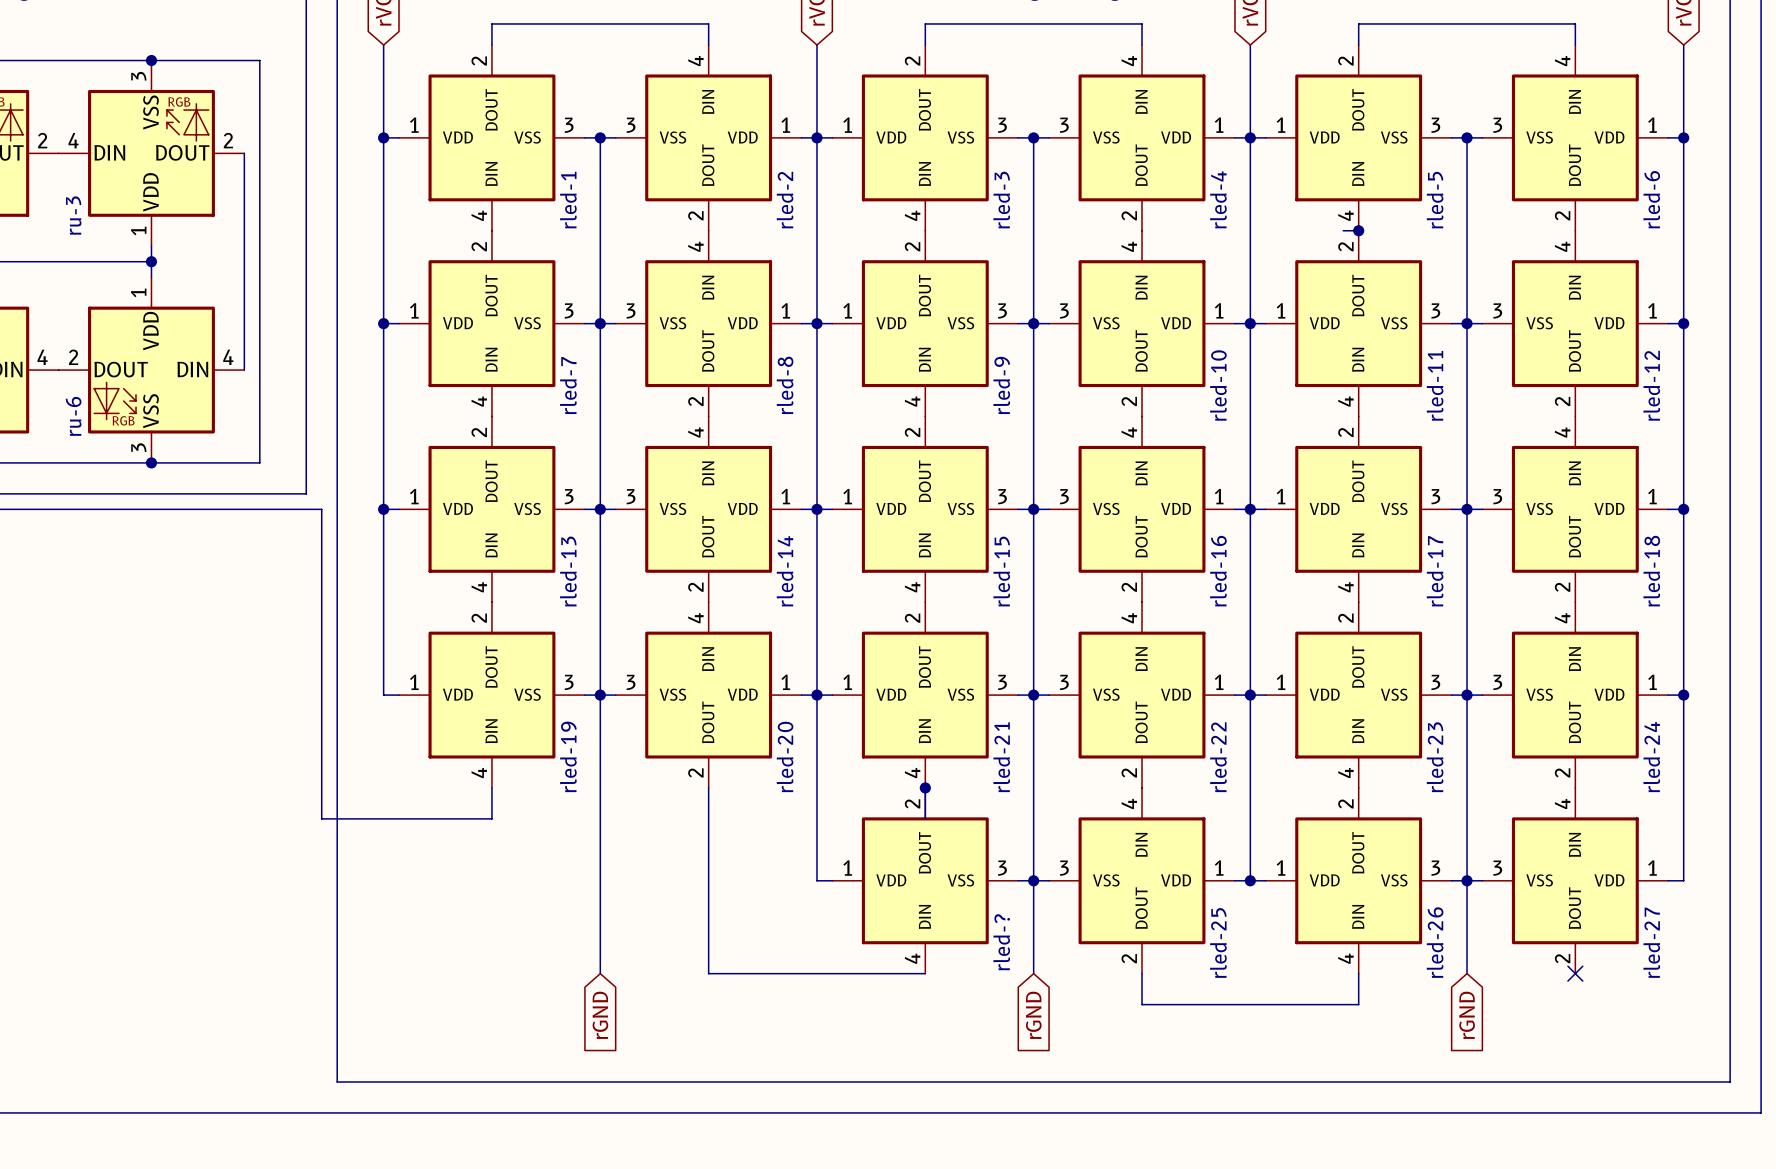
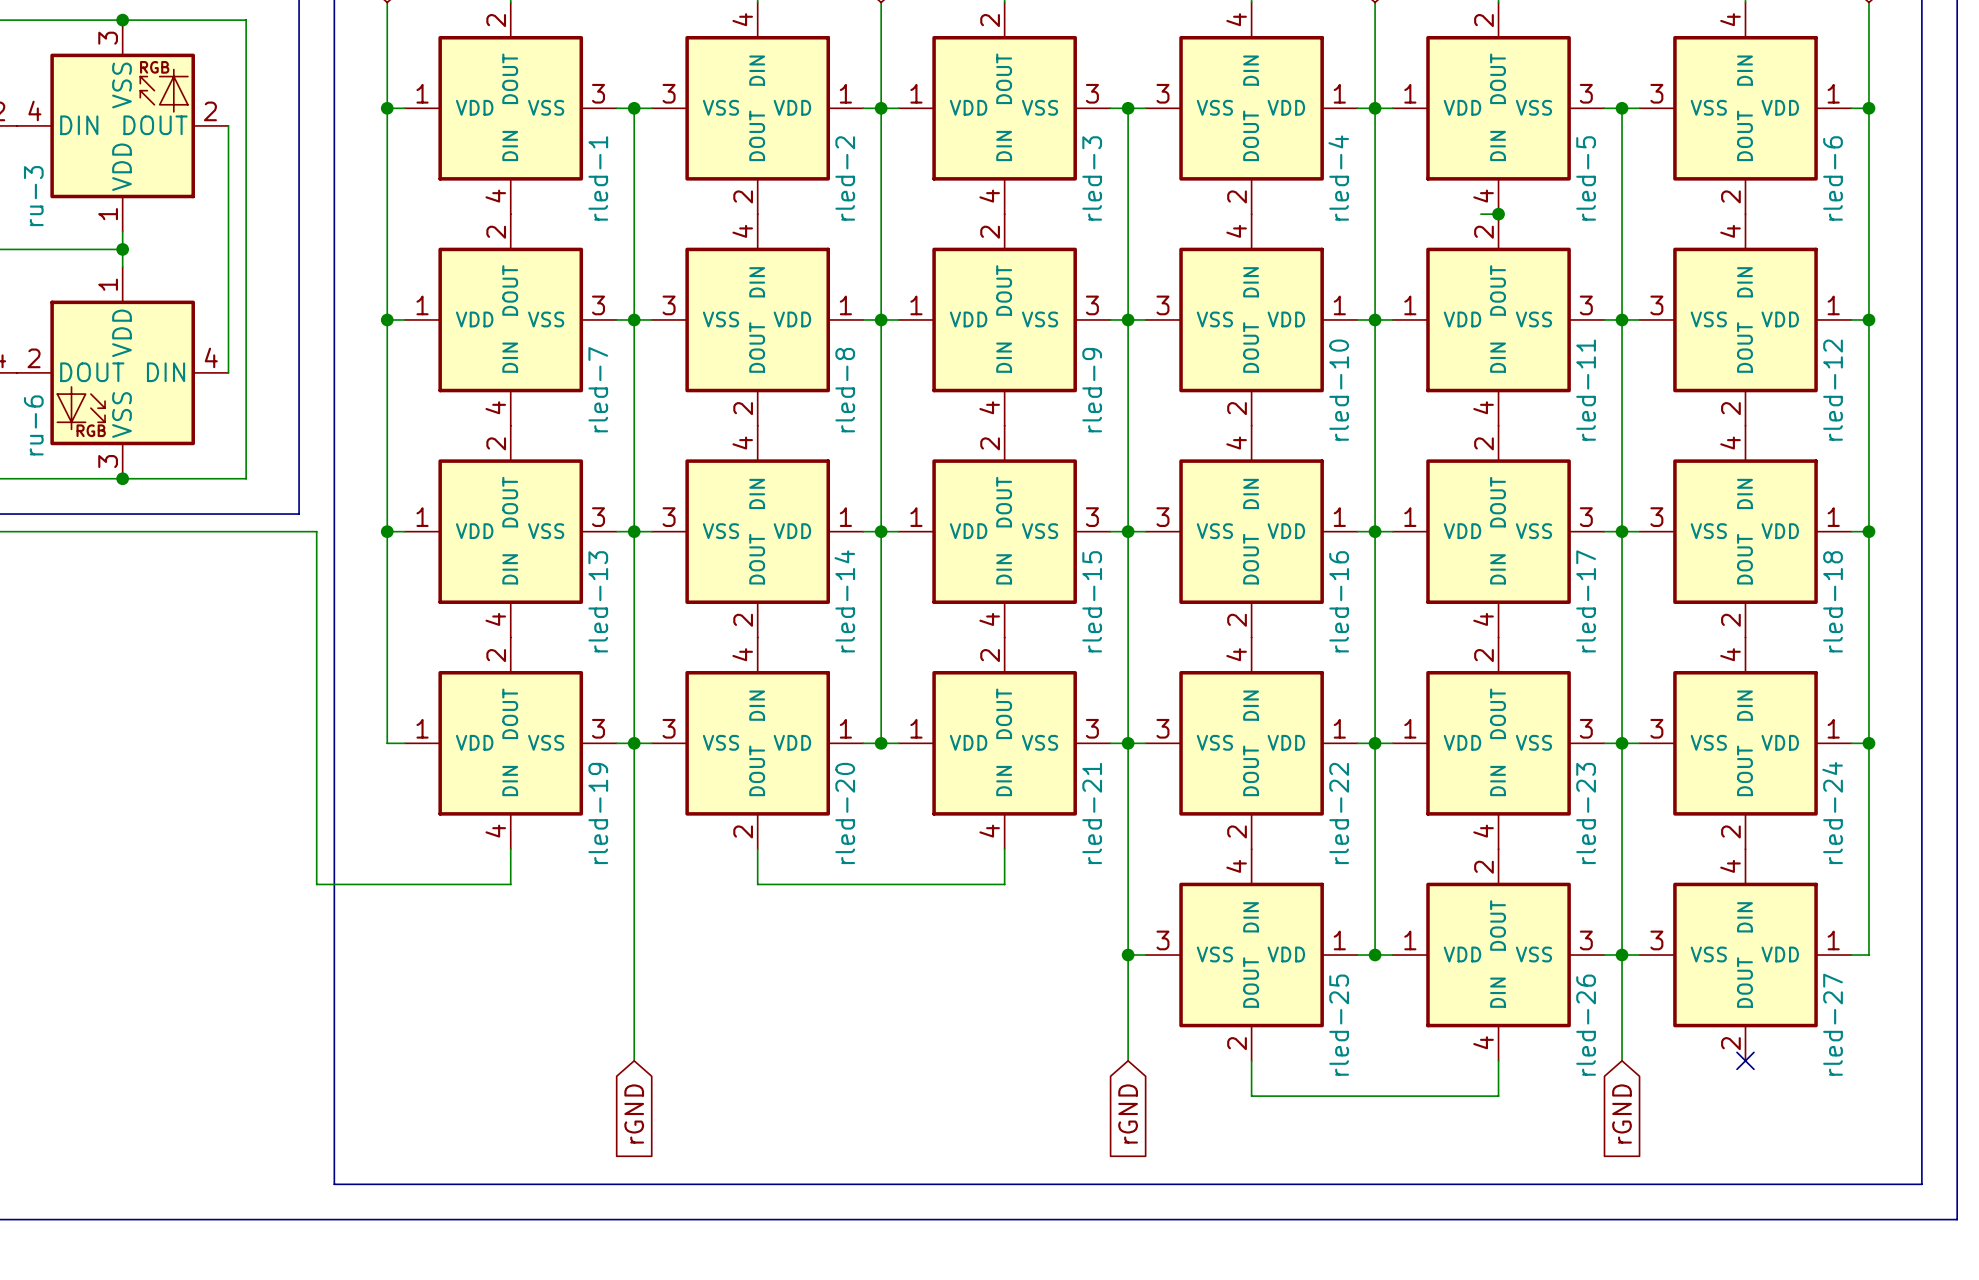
wire: (816, 695) (816, 880) (832, 880) -> none
junction: (925, 787) -> none
wire: (708, 818) (708, 973) (925, 973) -> (757, 884) (1004, 884)
rled-?: (925, 880) -> none
wire: (1018, 880) (1033, 880) -> none

